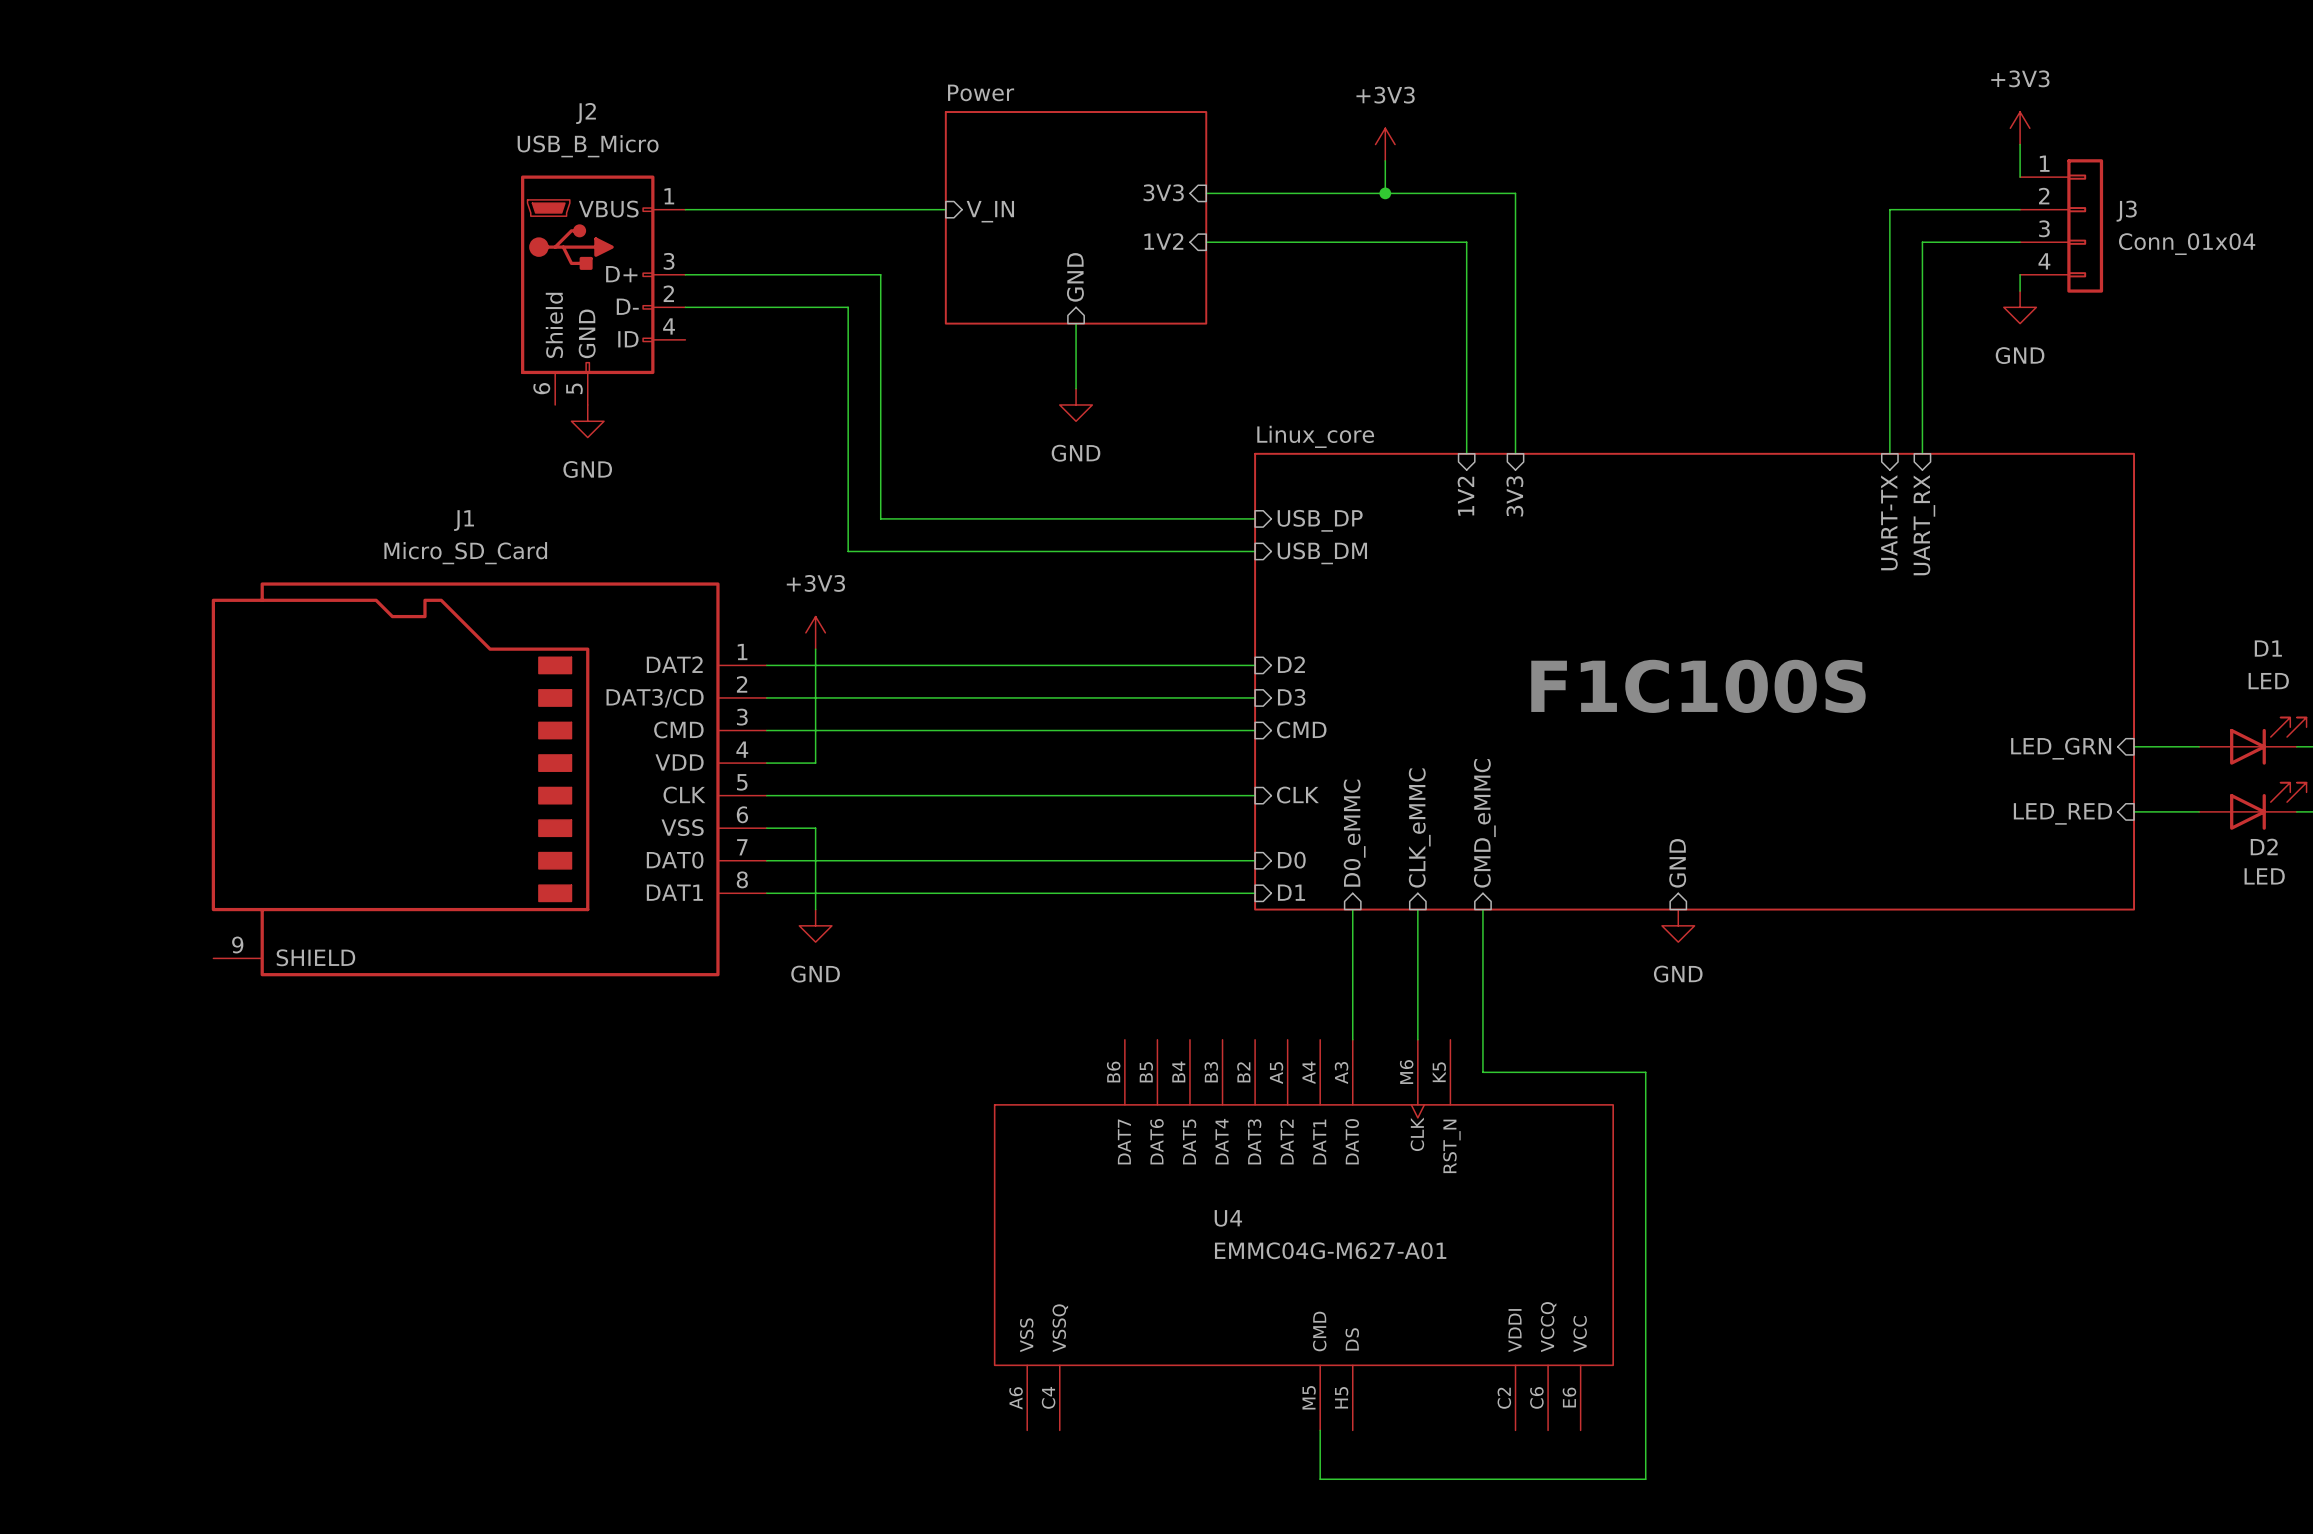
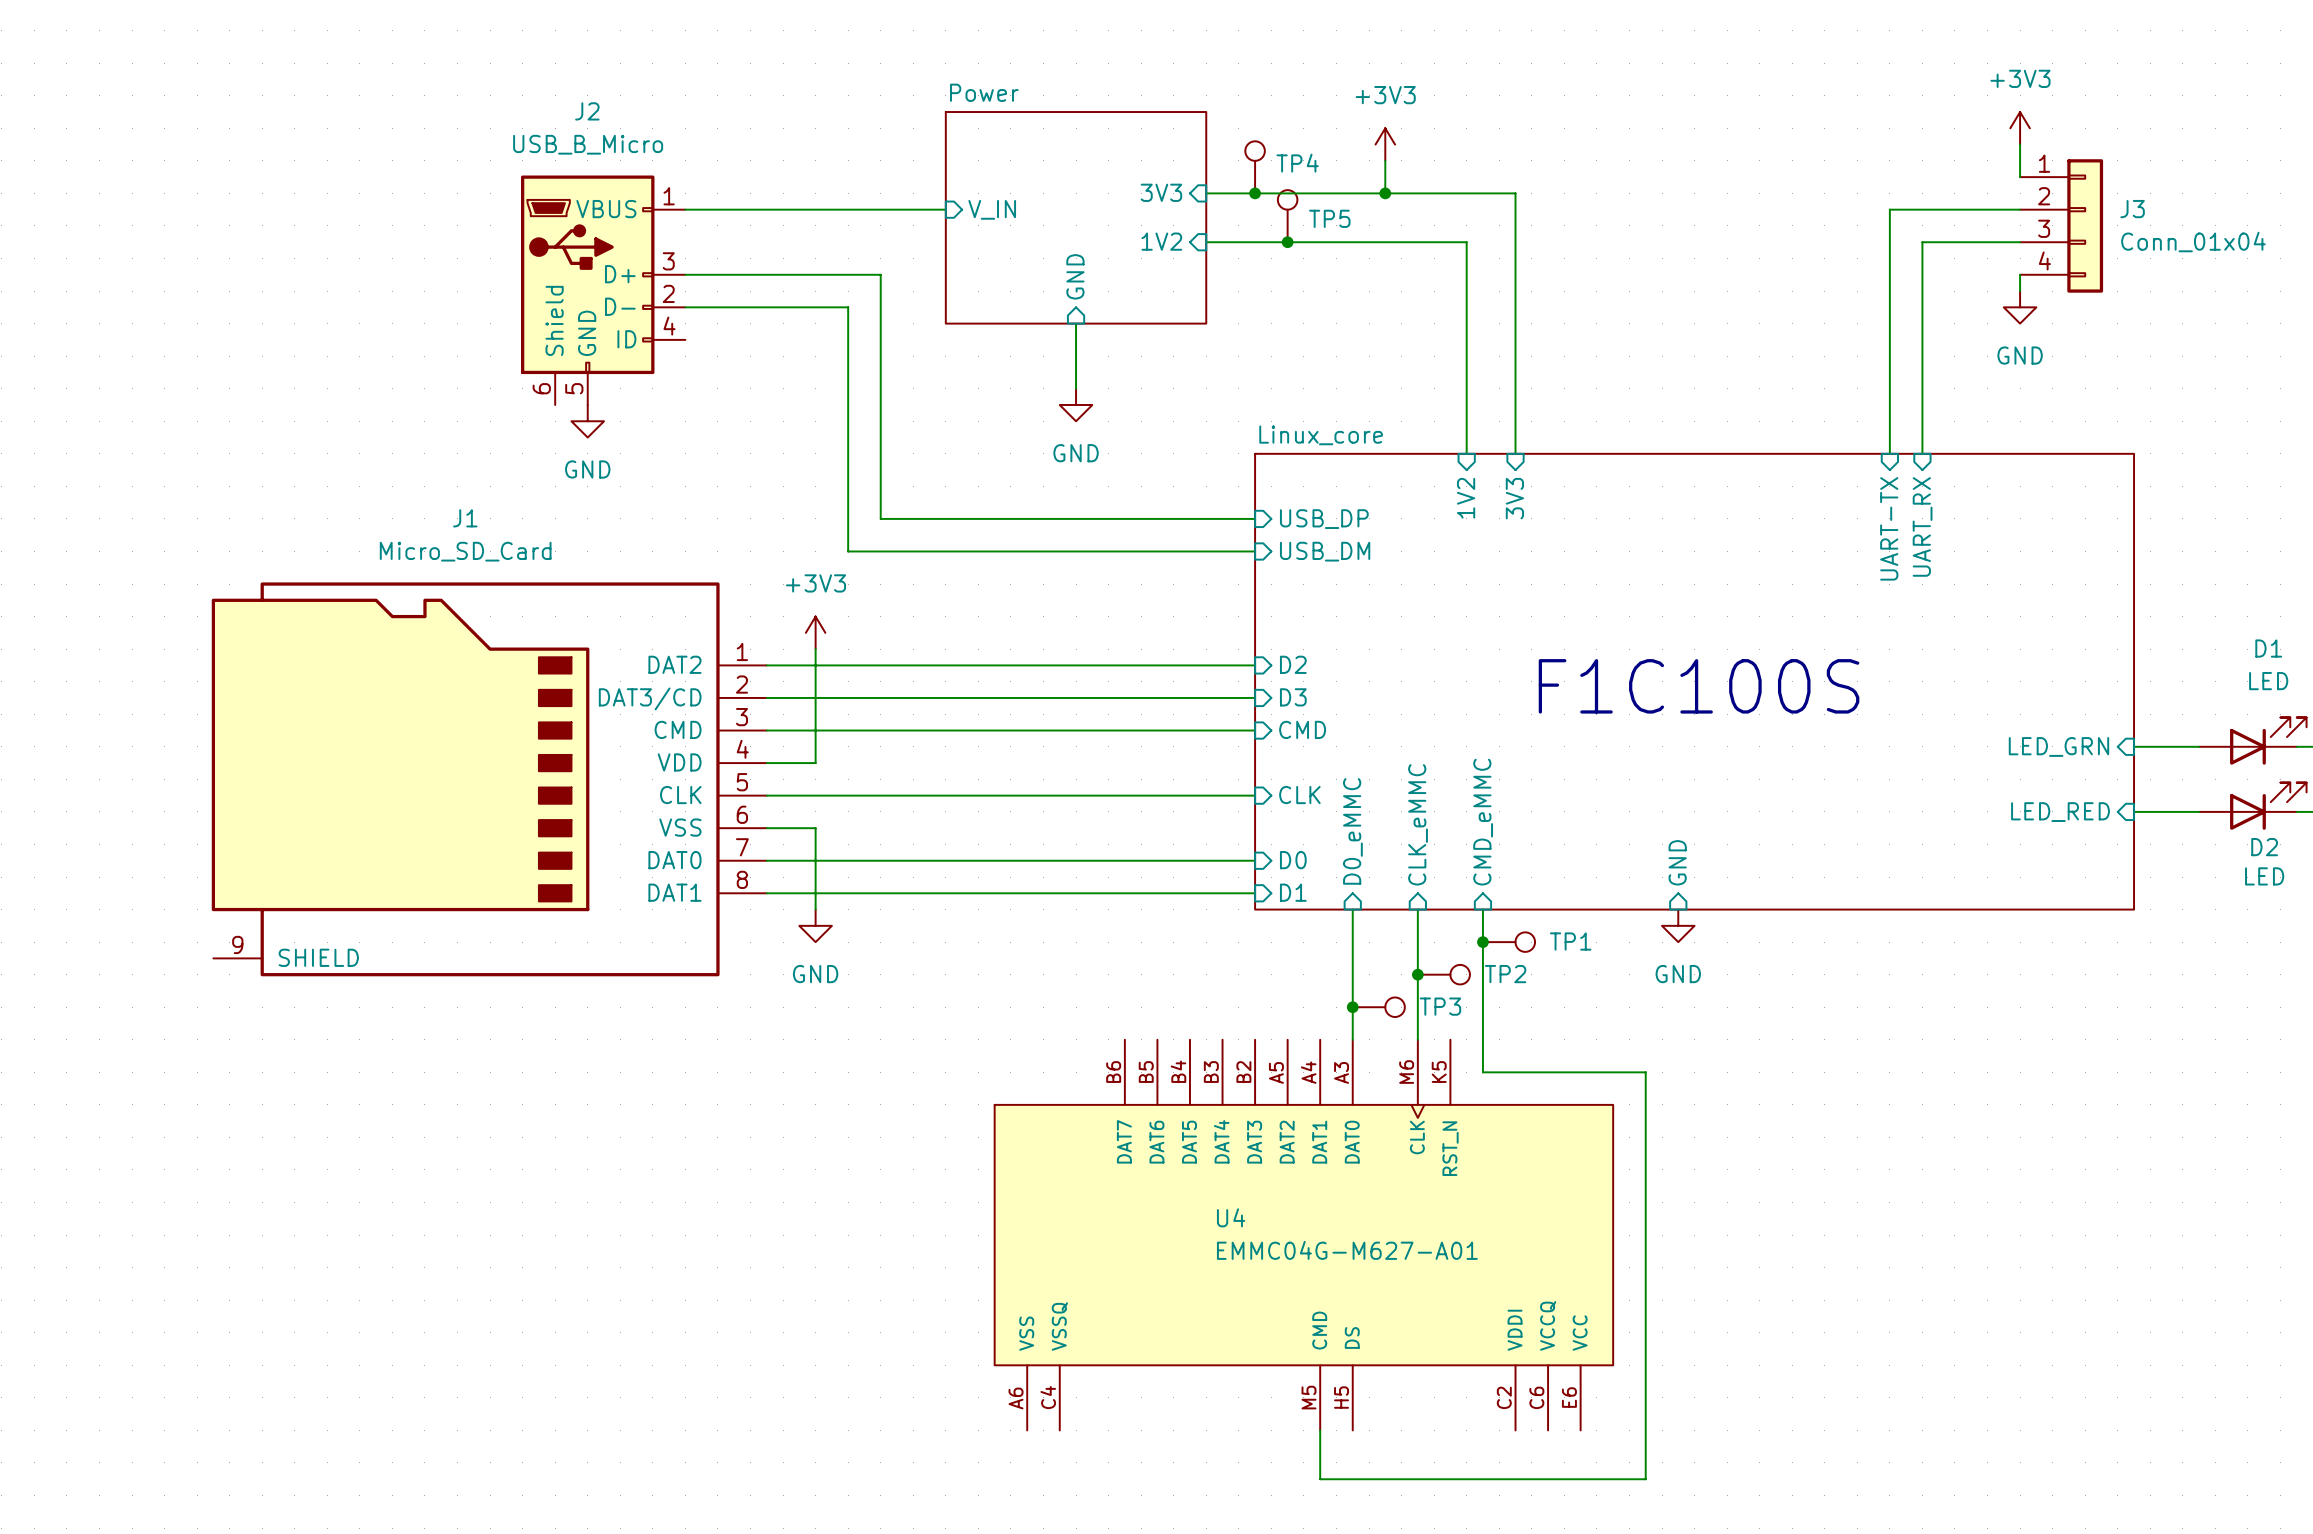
TP4: none -> (1255, 167)
junction: none -> (1255, 193)
TP5: none -> (1287, 216)
junction: none -> (1287, 242)
junction: none -> (1482, 942)
TP1: none -> (1509, 942)
junction: none -> (1417, 974)
TP2: none -> (1443, 974)
junction: none -> (1352, 1007)
TP3: none -> (1378, 1007)

